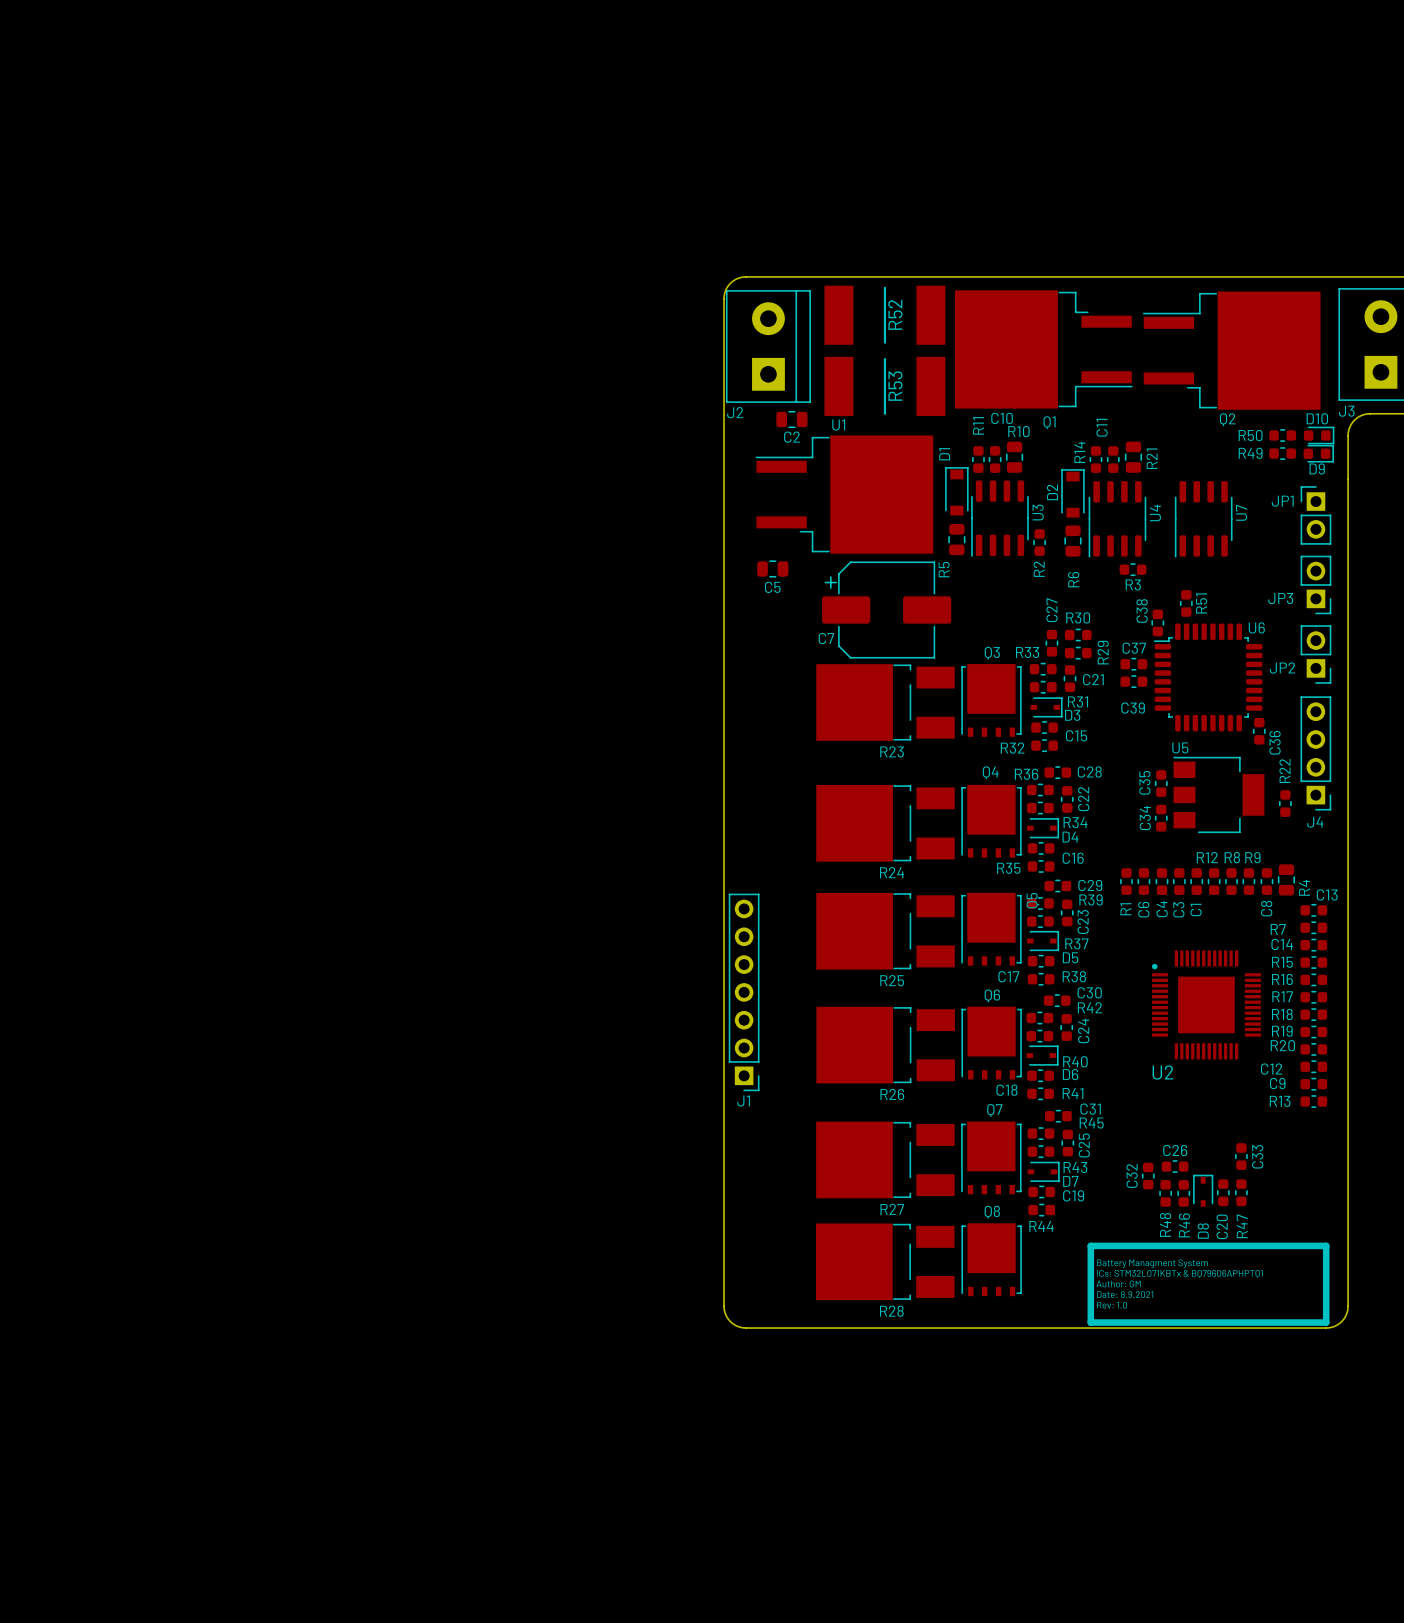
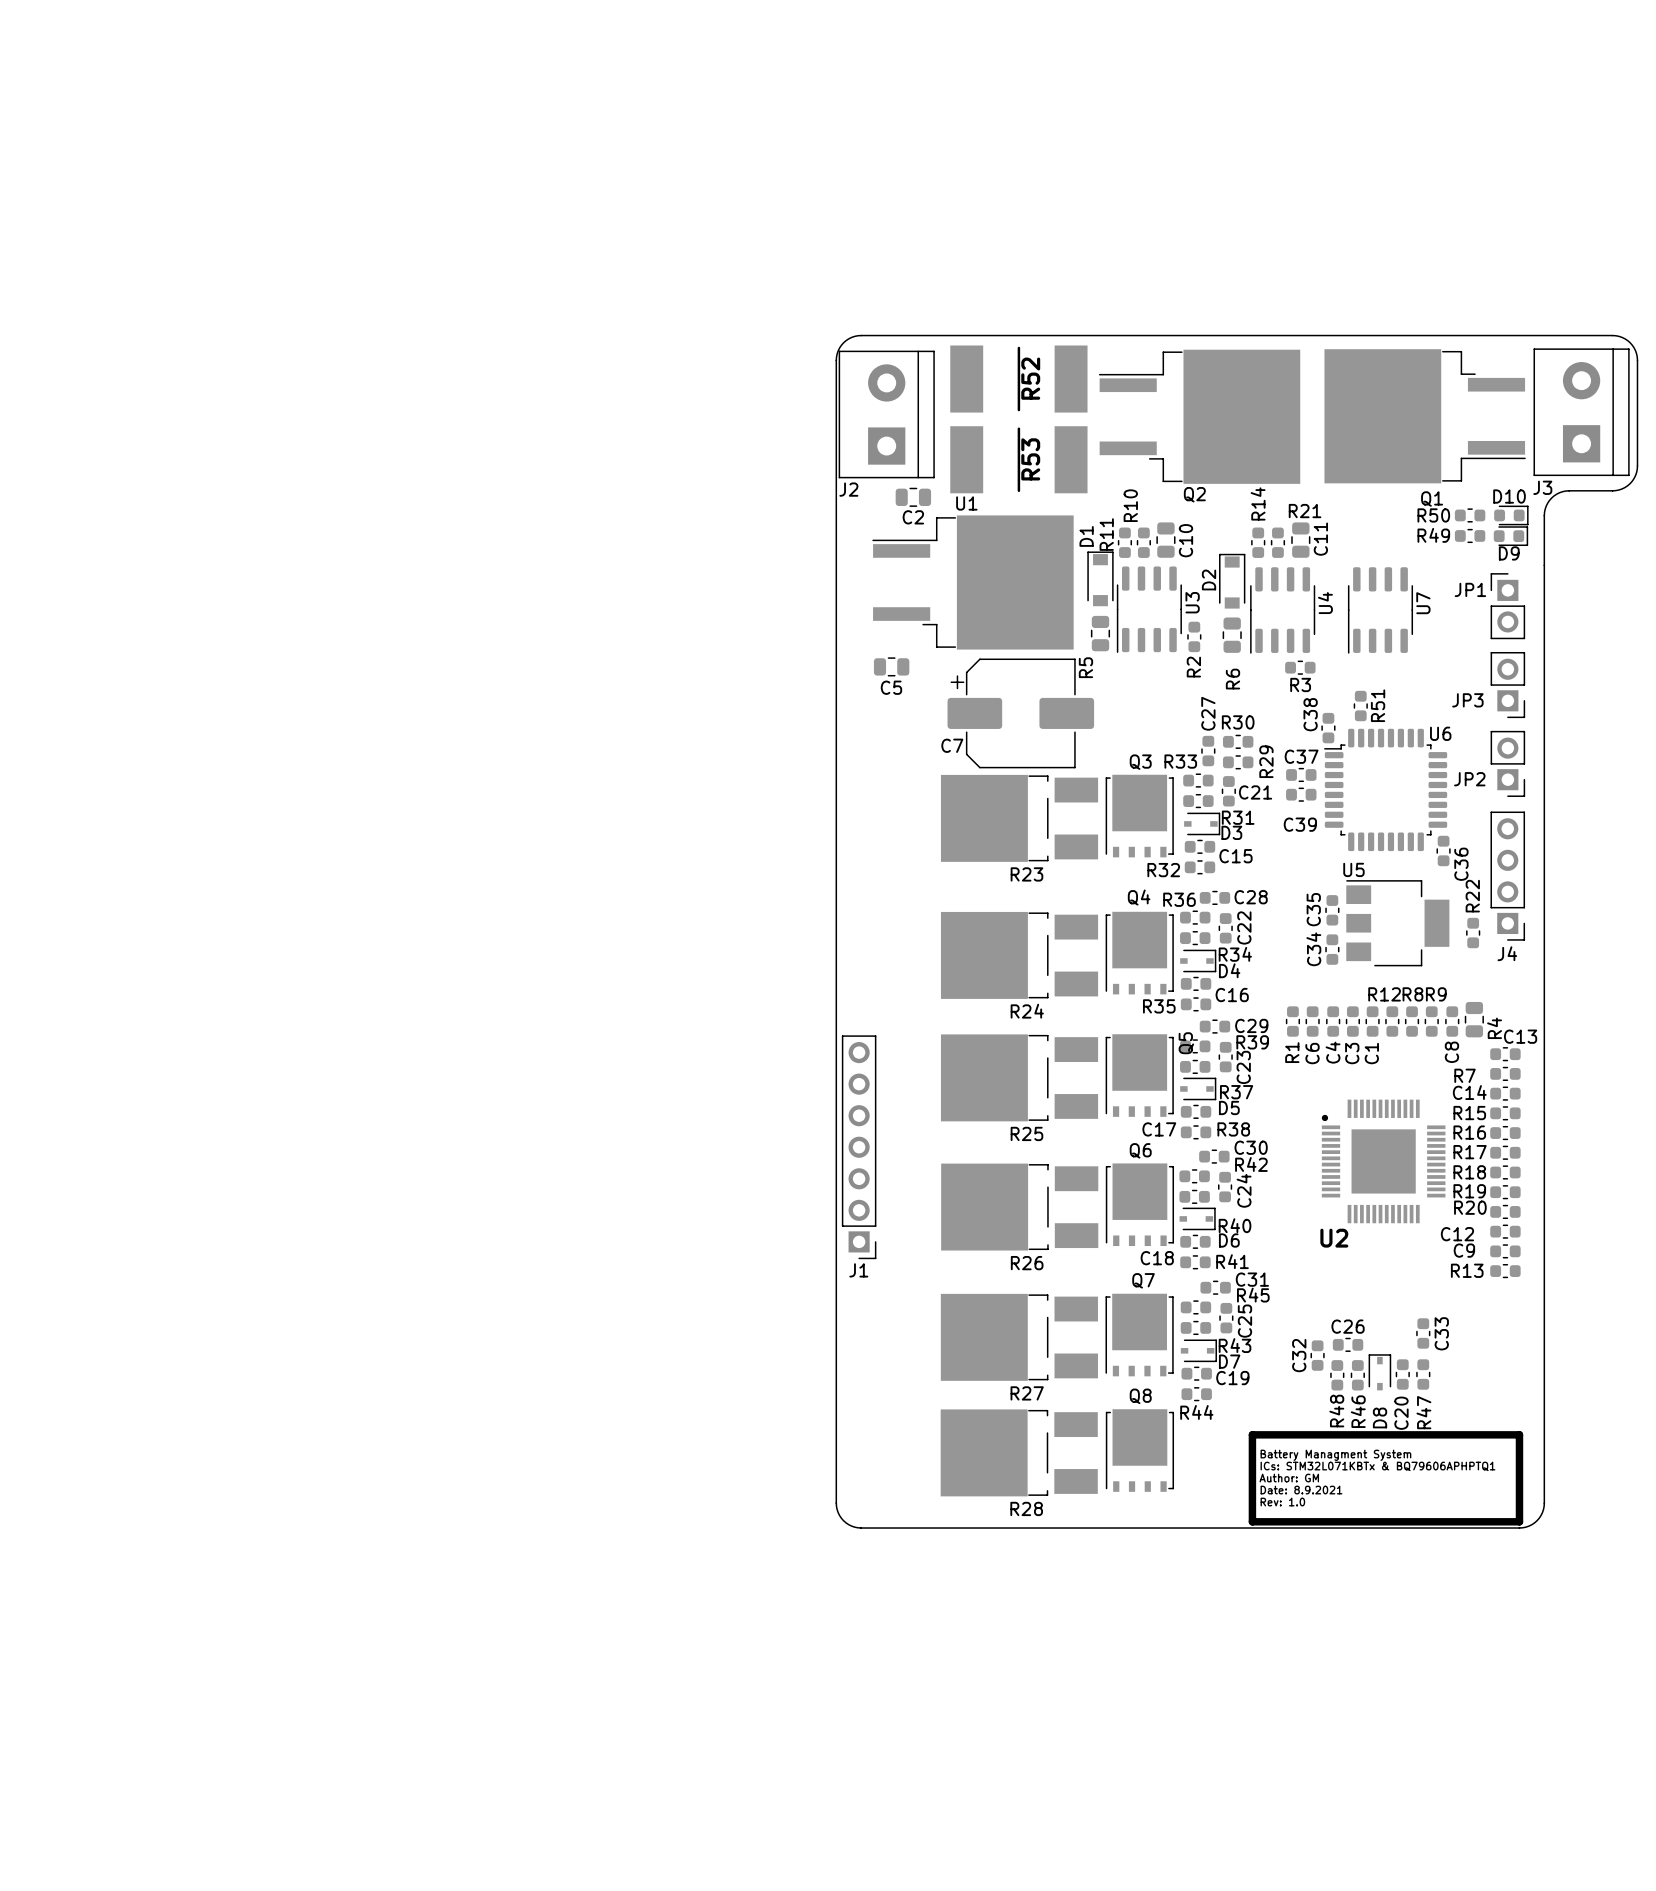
Q1 position: (1043, 349) -> (1425, 416)
Q2 position: (1231, 350) -> (1199, 416)
C10 name rotation: 0° (1002, 418) -> 90° counterclockwise (1185, 540)
C10 name position: C10 (1002, 418) -> C10 (1185, 540)
R11 name position: R11 (978, 425) -> R11 (1106, 534)
C11 name position: C11 (1102, 427) -> C11 (1320, 539)
R10 name rotation: 0° (1018, 431) -> 90° counterclockwise (1130, 505)
R14 name position: R14 (1079, 452) -> R14 (1258, 503)
R21 name rotation: 0° (1152, 458) -> 90° clockwise (1305, 511)

